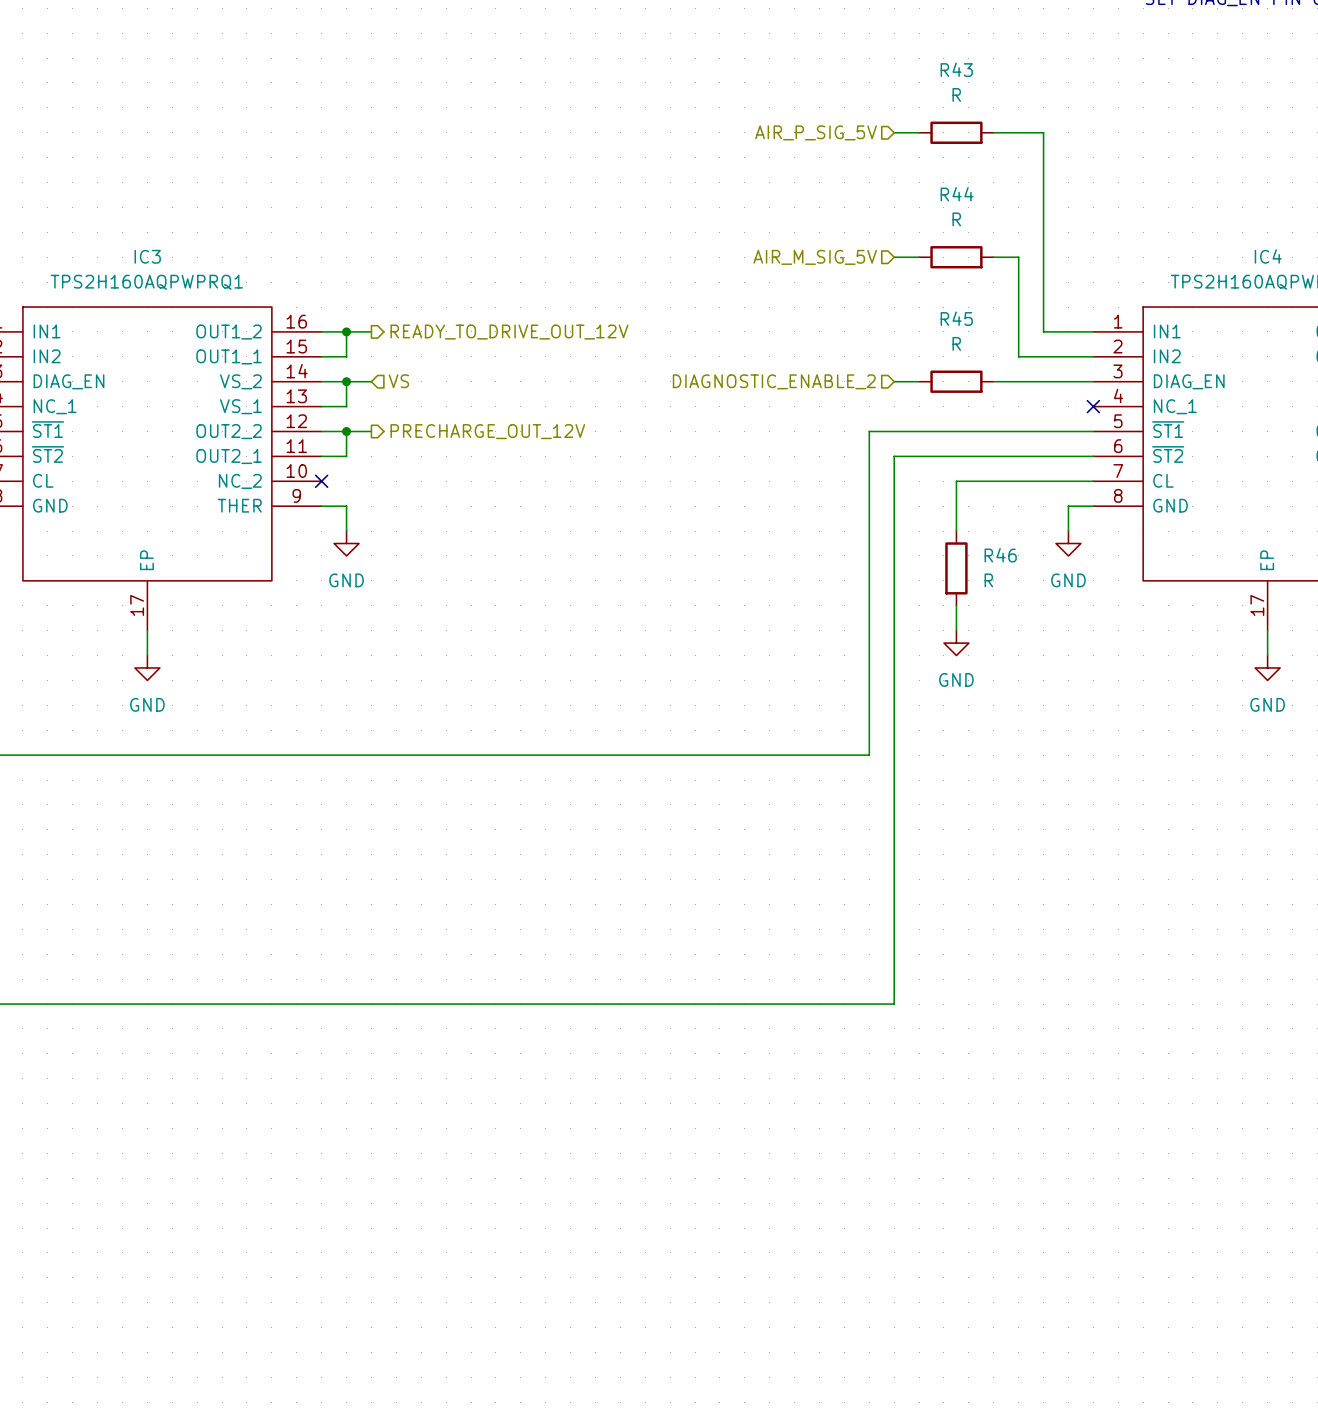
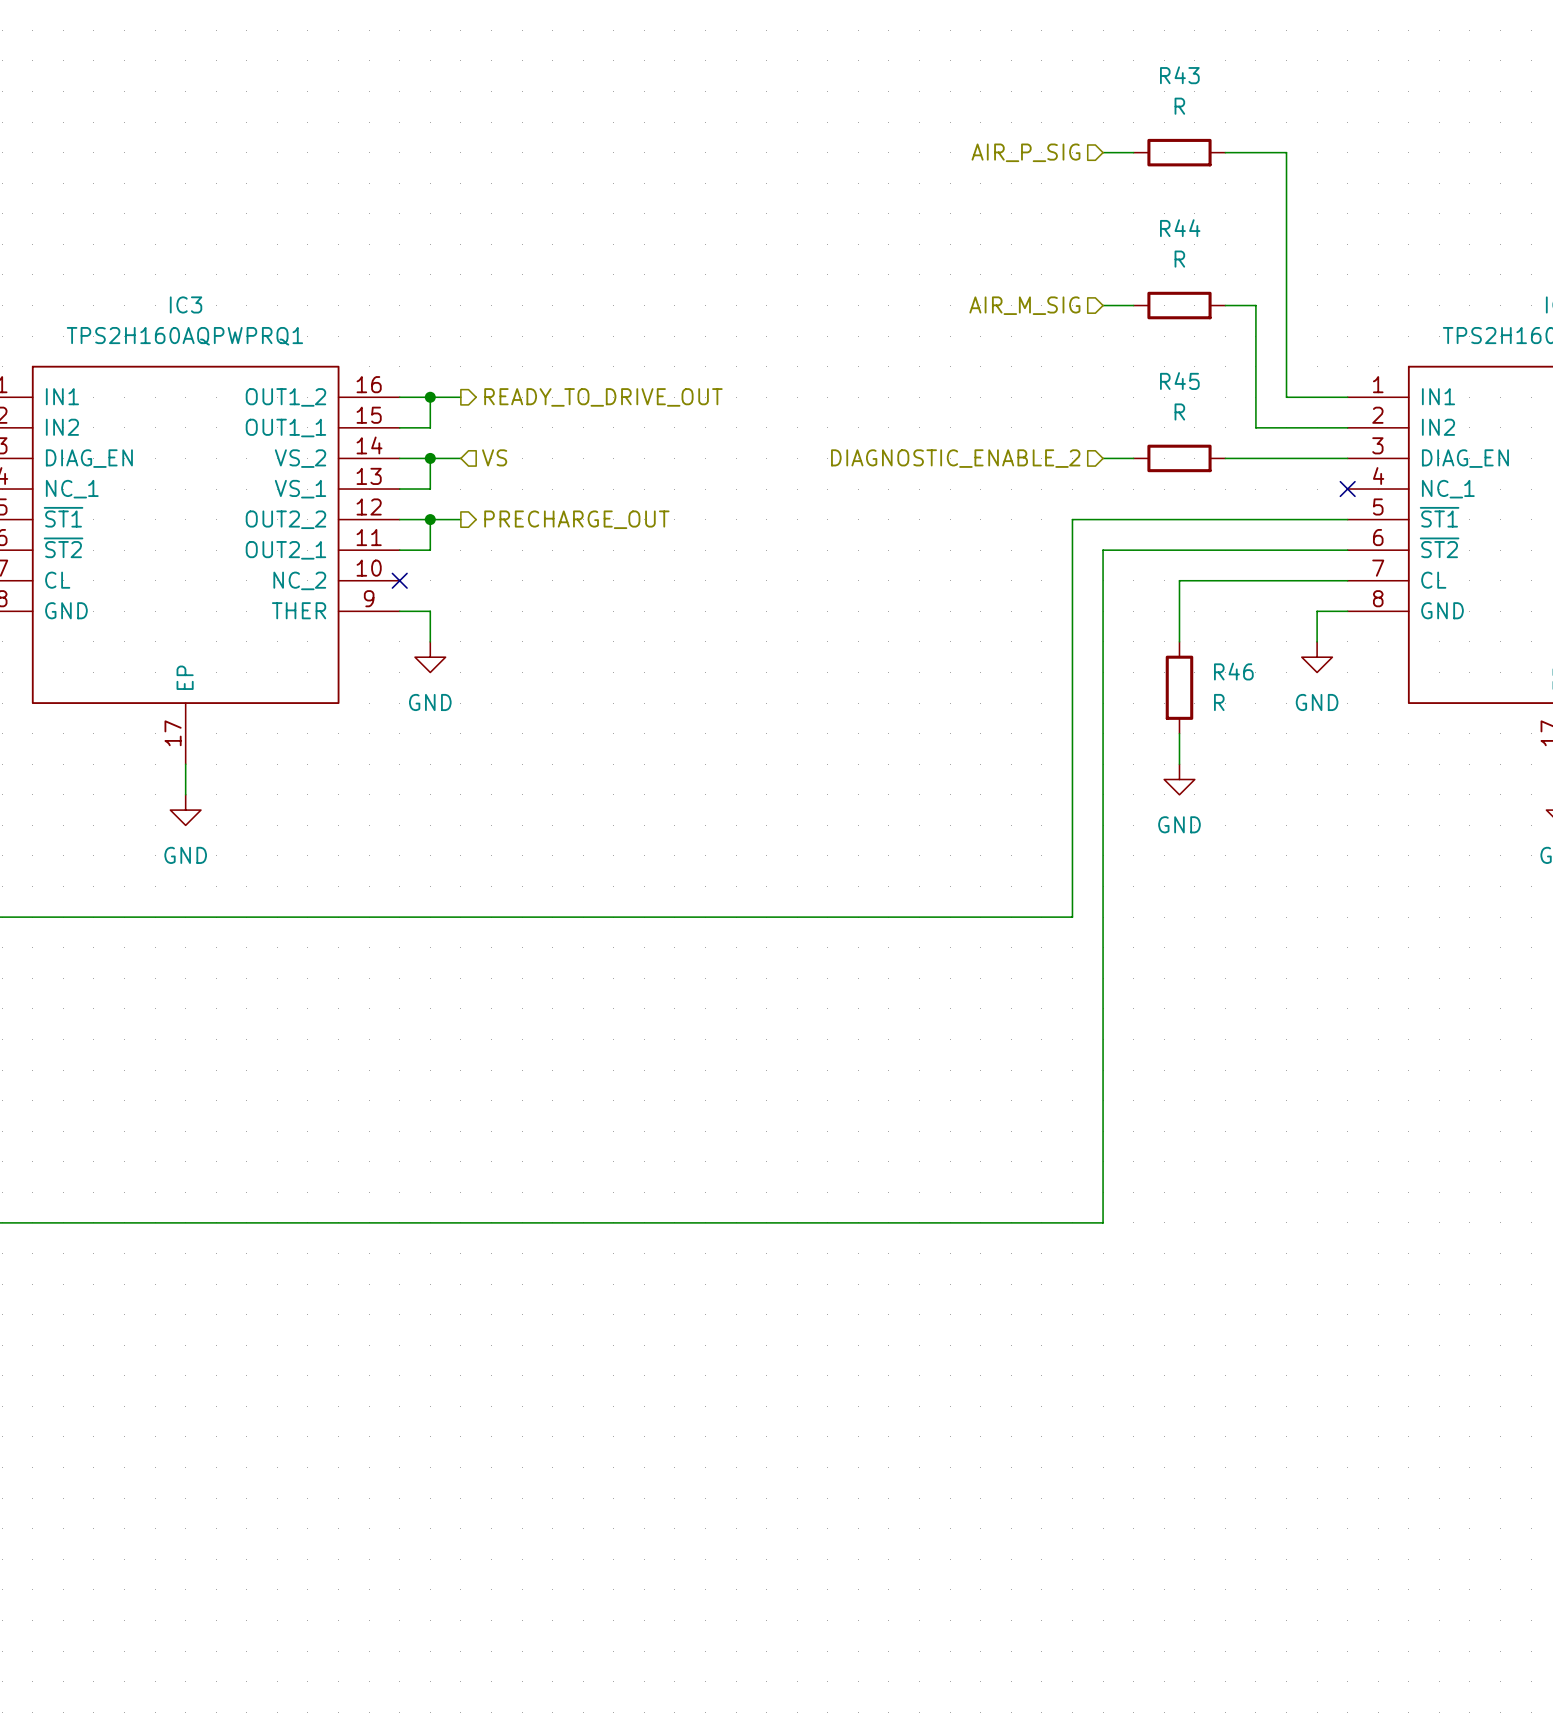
hierarchical label: AIR_P_SIG_5V (816, 132) -> AIR_P_SIG (1025, 152)
hierarchical label: AIR_M_SIG_5V (815, 257) -> AIR_M_SIG (1024, 305)
hierarchical label: READY_TO_DRIVE_OUT_12V (509, 332) -> READY_TO_DRIVE_OUT (603, 397)
hierarchical label: PRECHARGE_OUT_12V (487, 431) -> PRECHARGE_OUT (576, 519)

